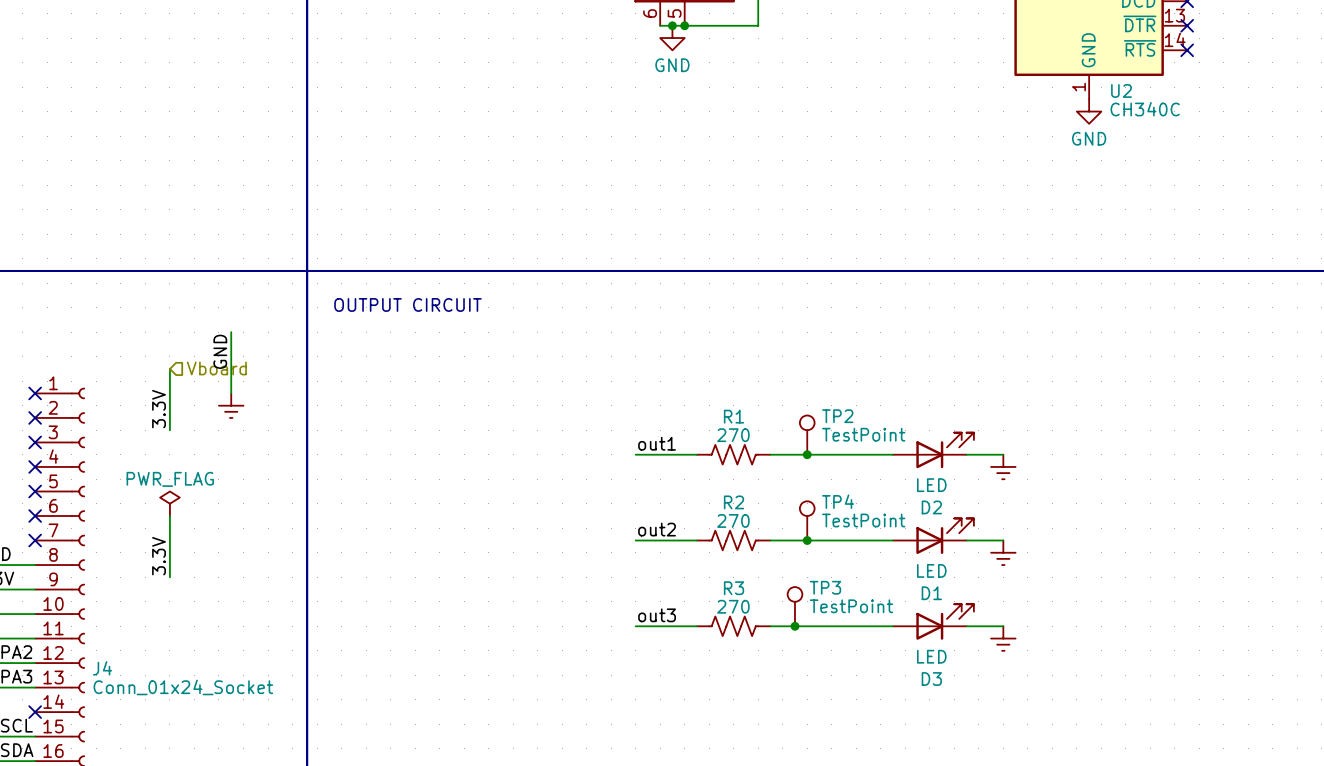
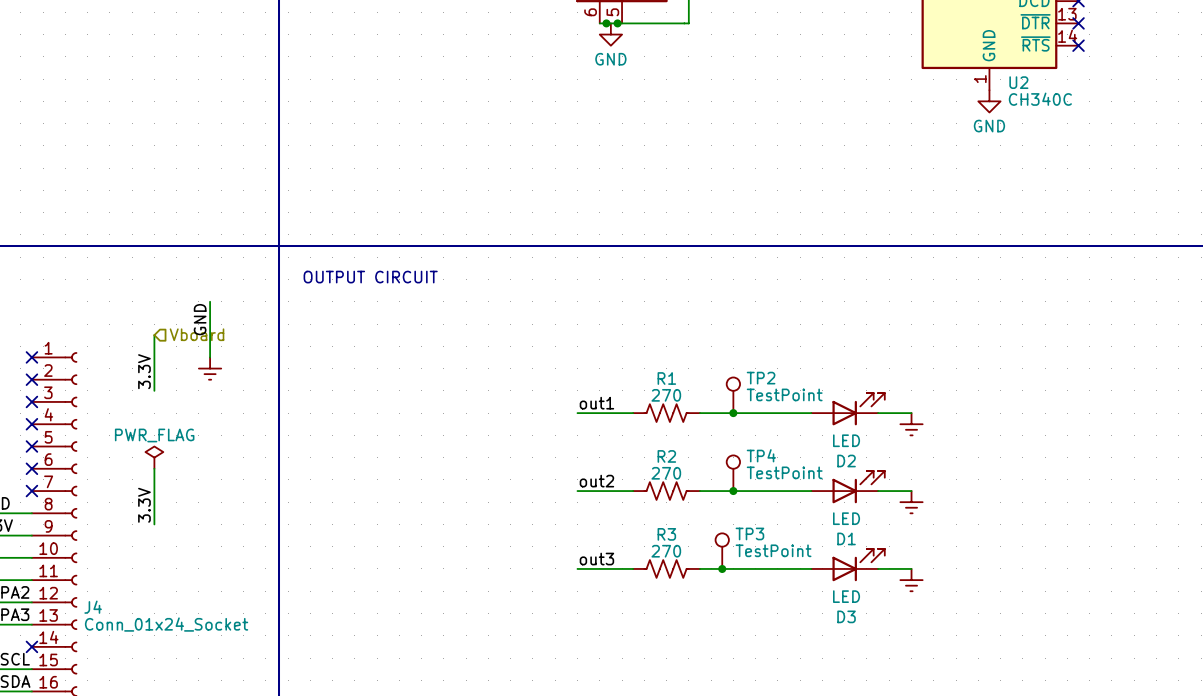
junction: none -> (606, 23)
junction: (672, 25) -> none
junction: none -> (617, 23)
junction: (684, 25) -> none

